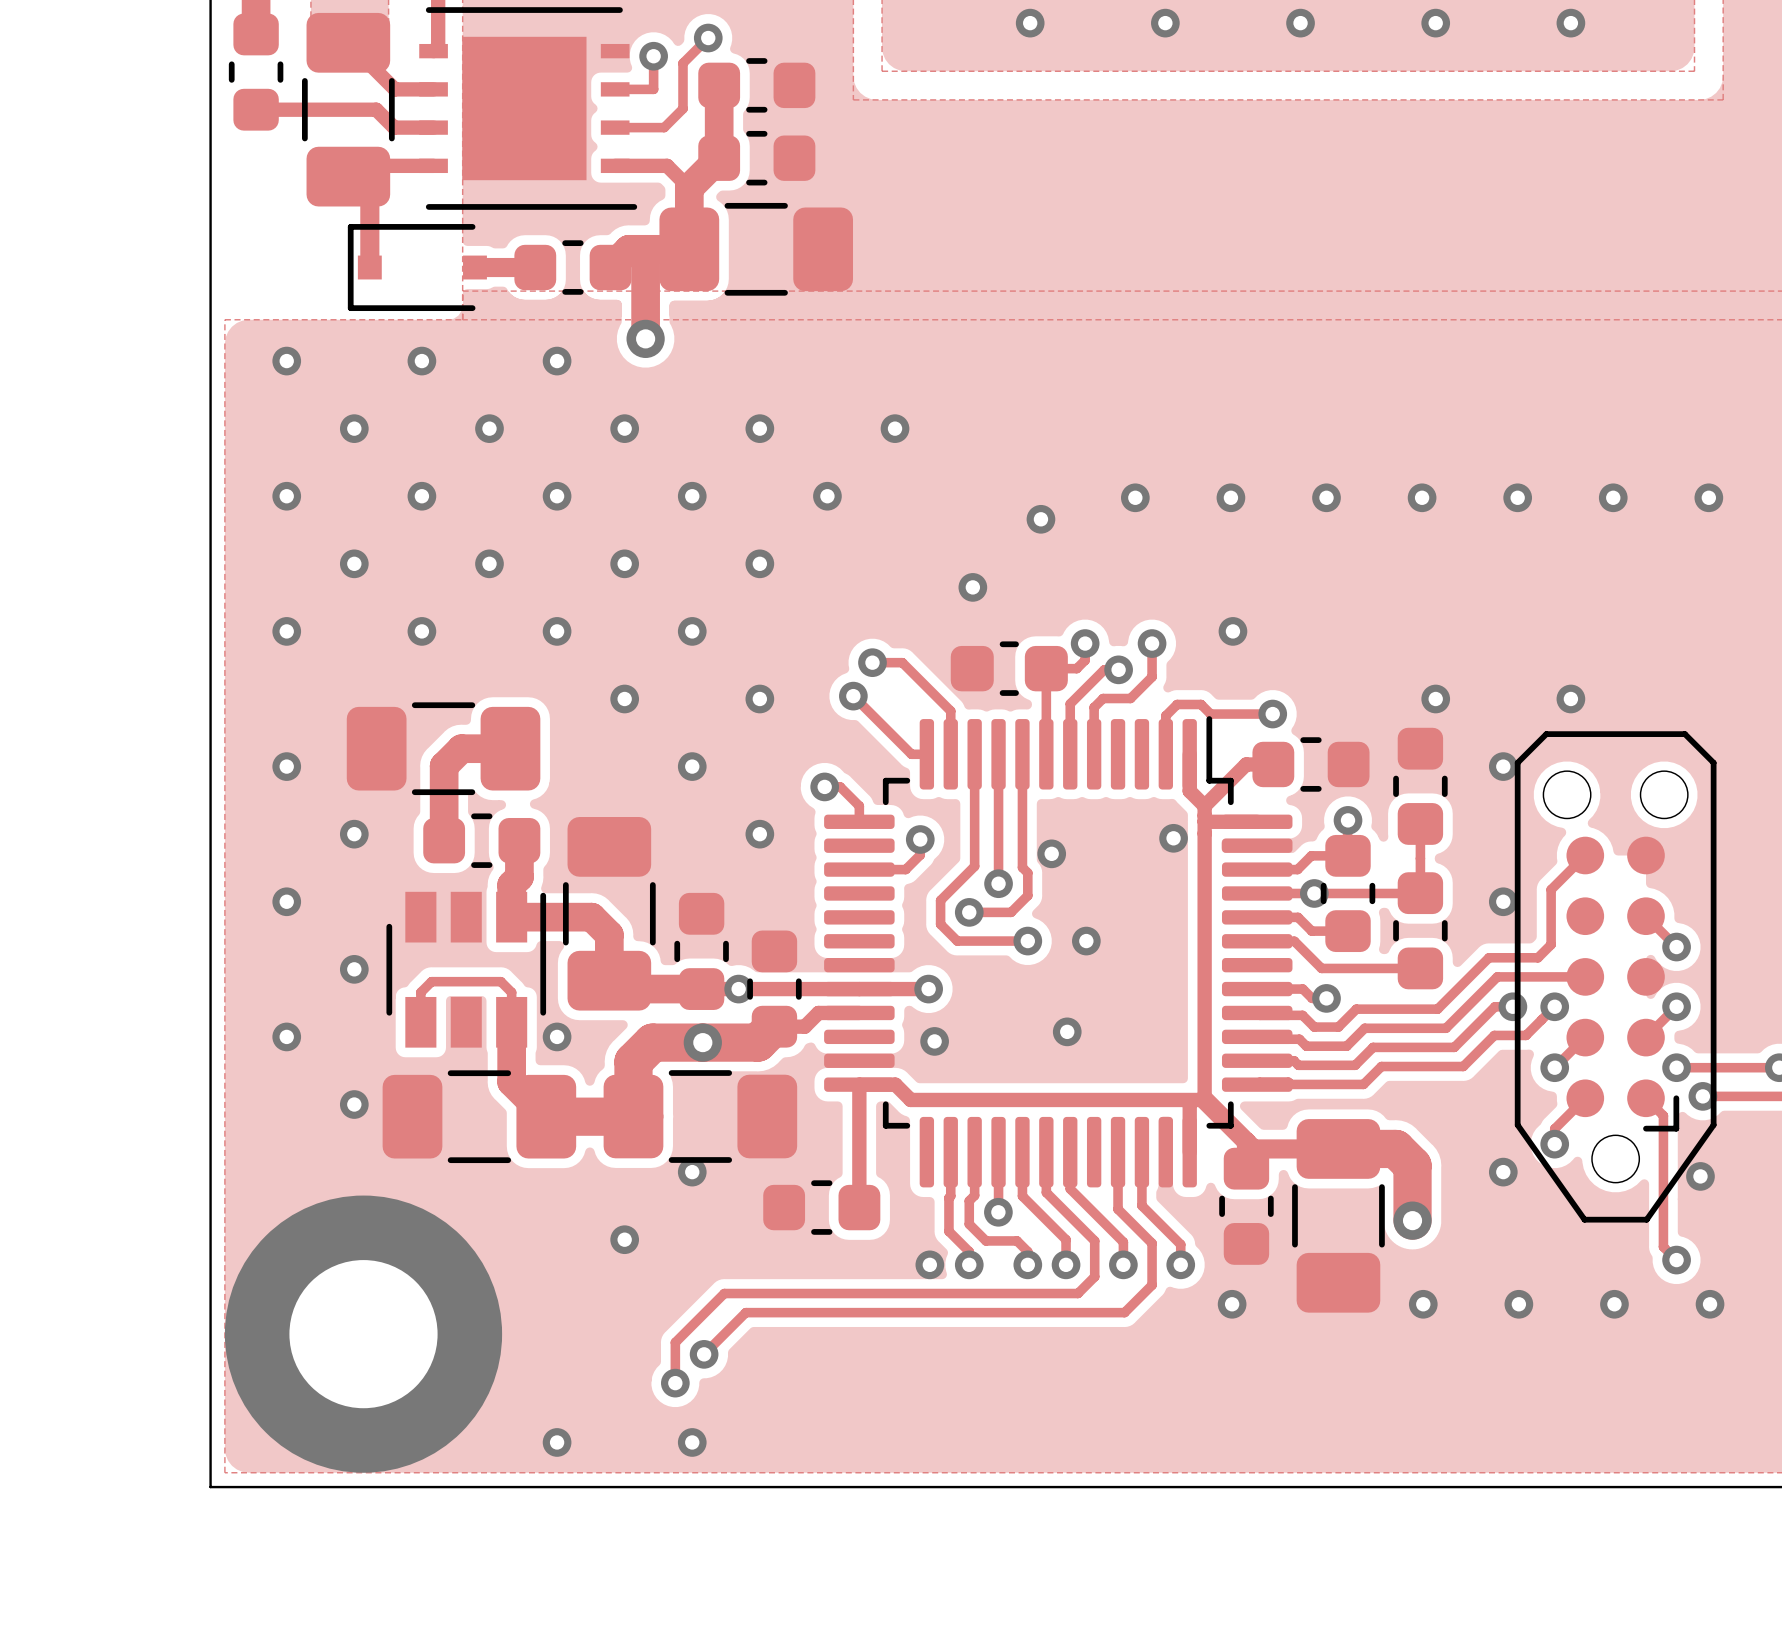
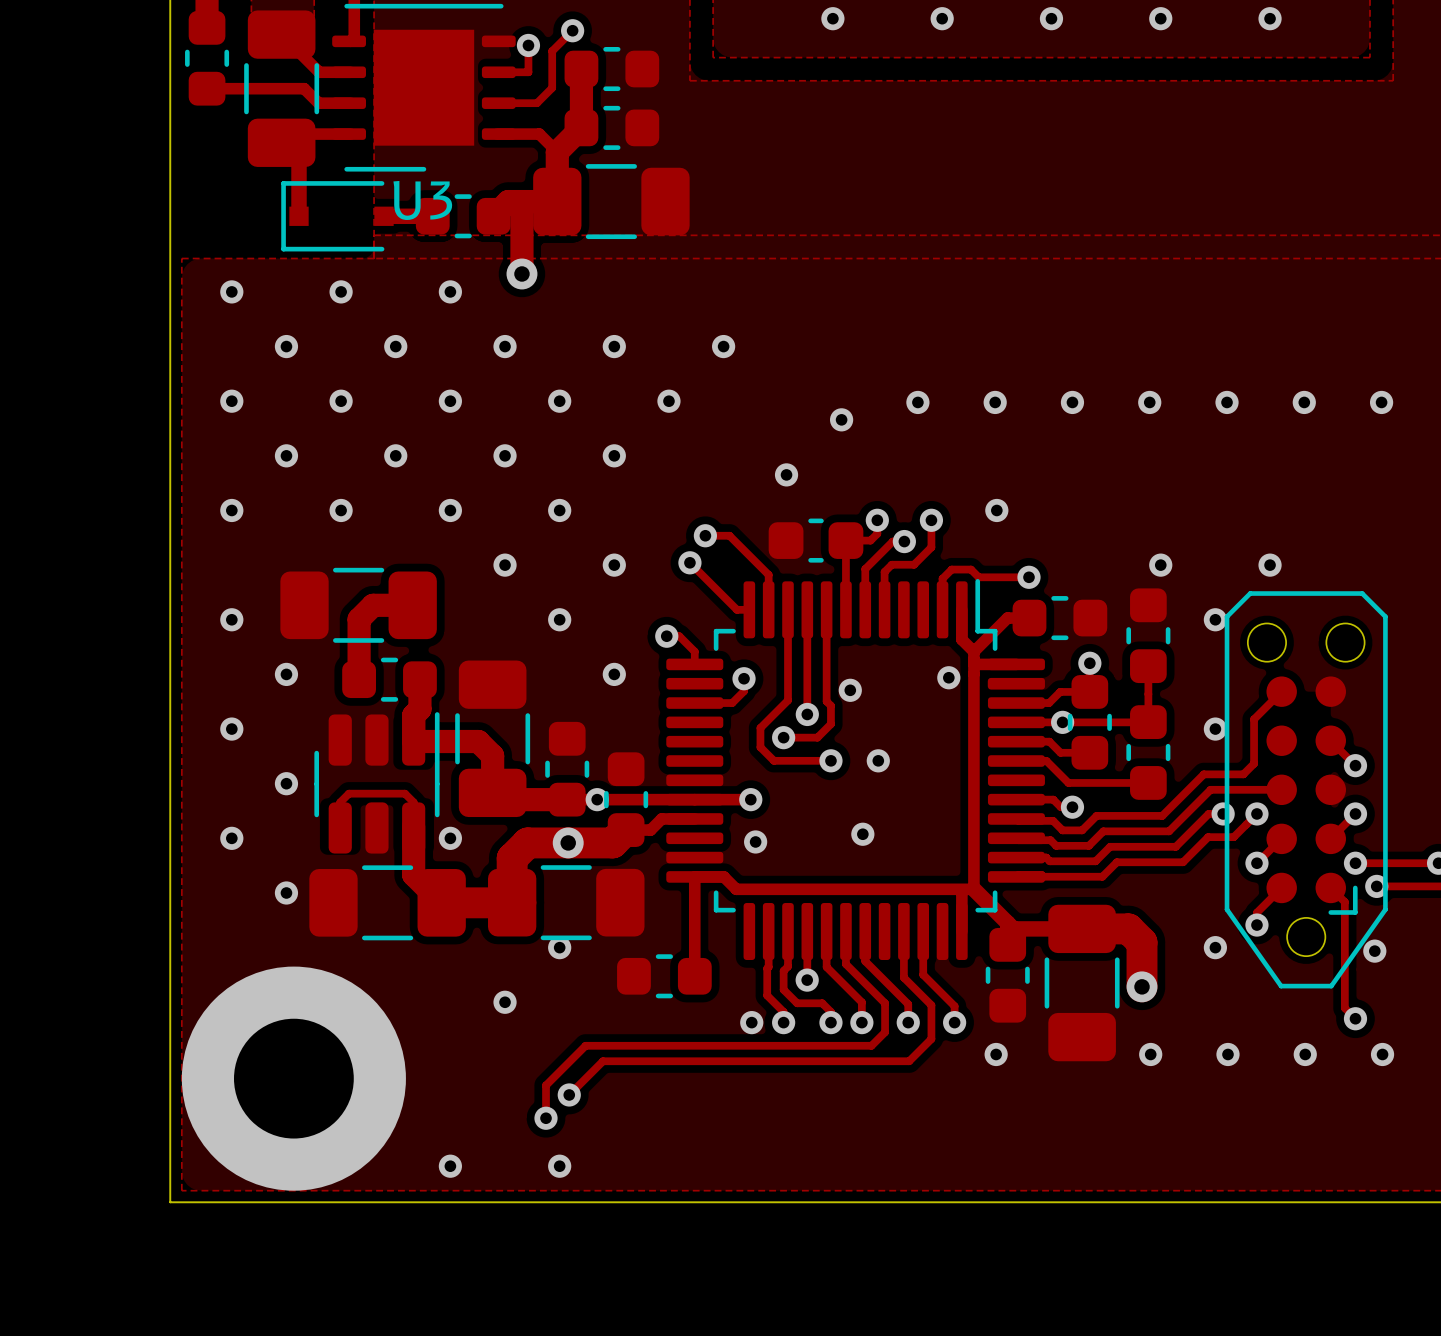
U3: none -> (423, 87)
part: (528, 108) -> none
part footprint: [386, 891, 547, 1048] -> [314, 712, 440, 854]

